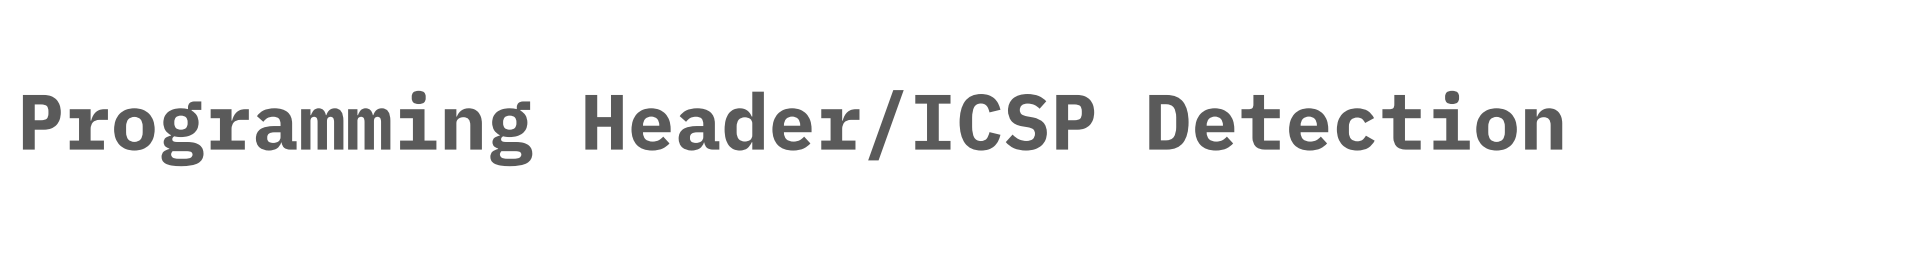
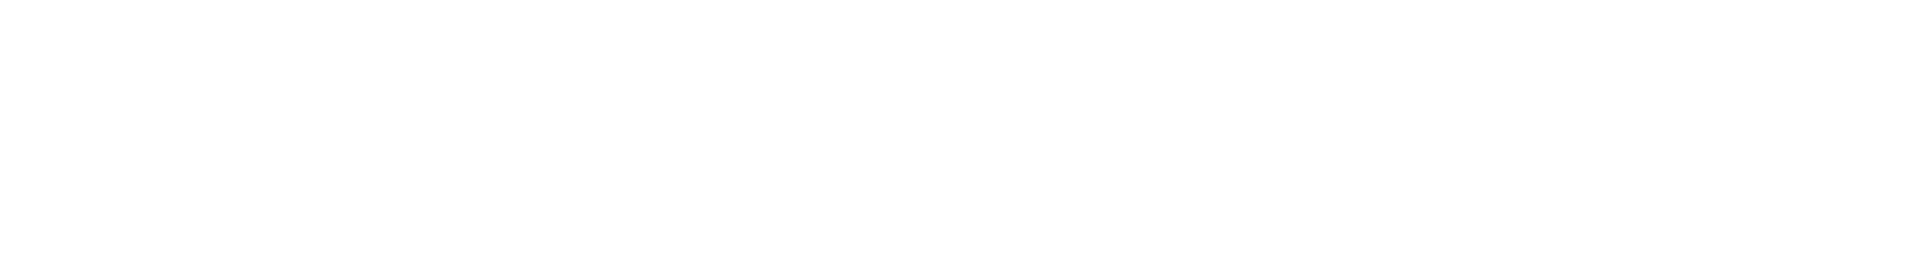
text: Programming Header/ICSP Detection (792, 128) -> none

